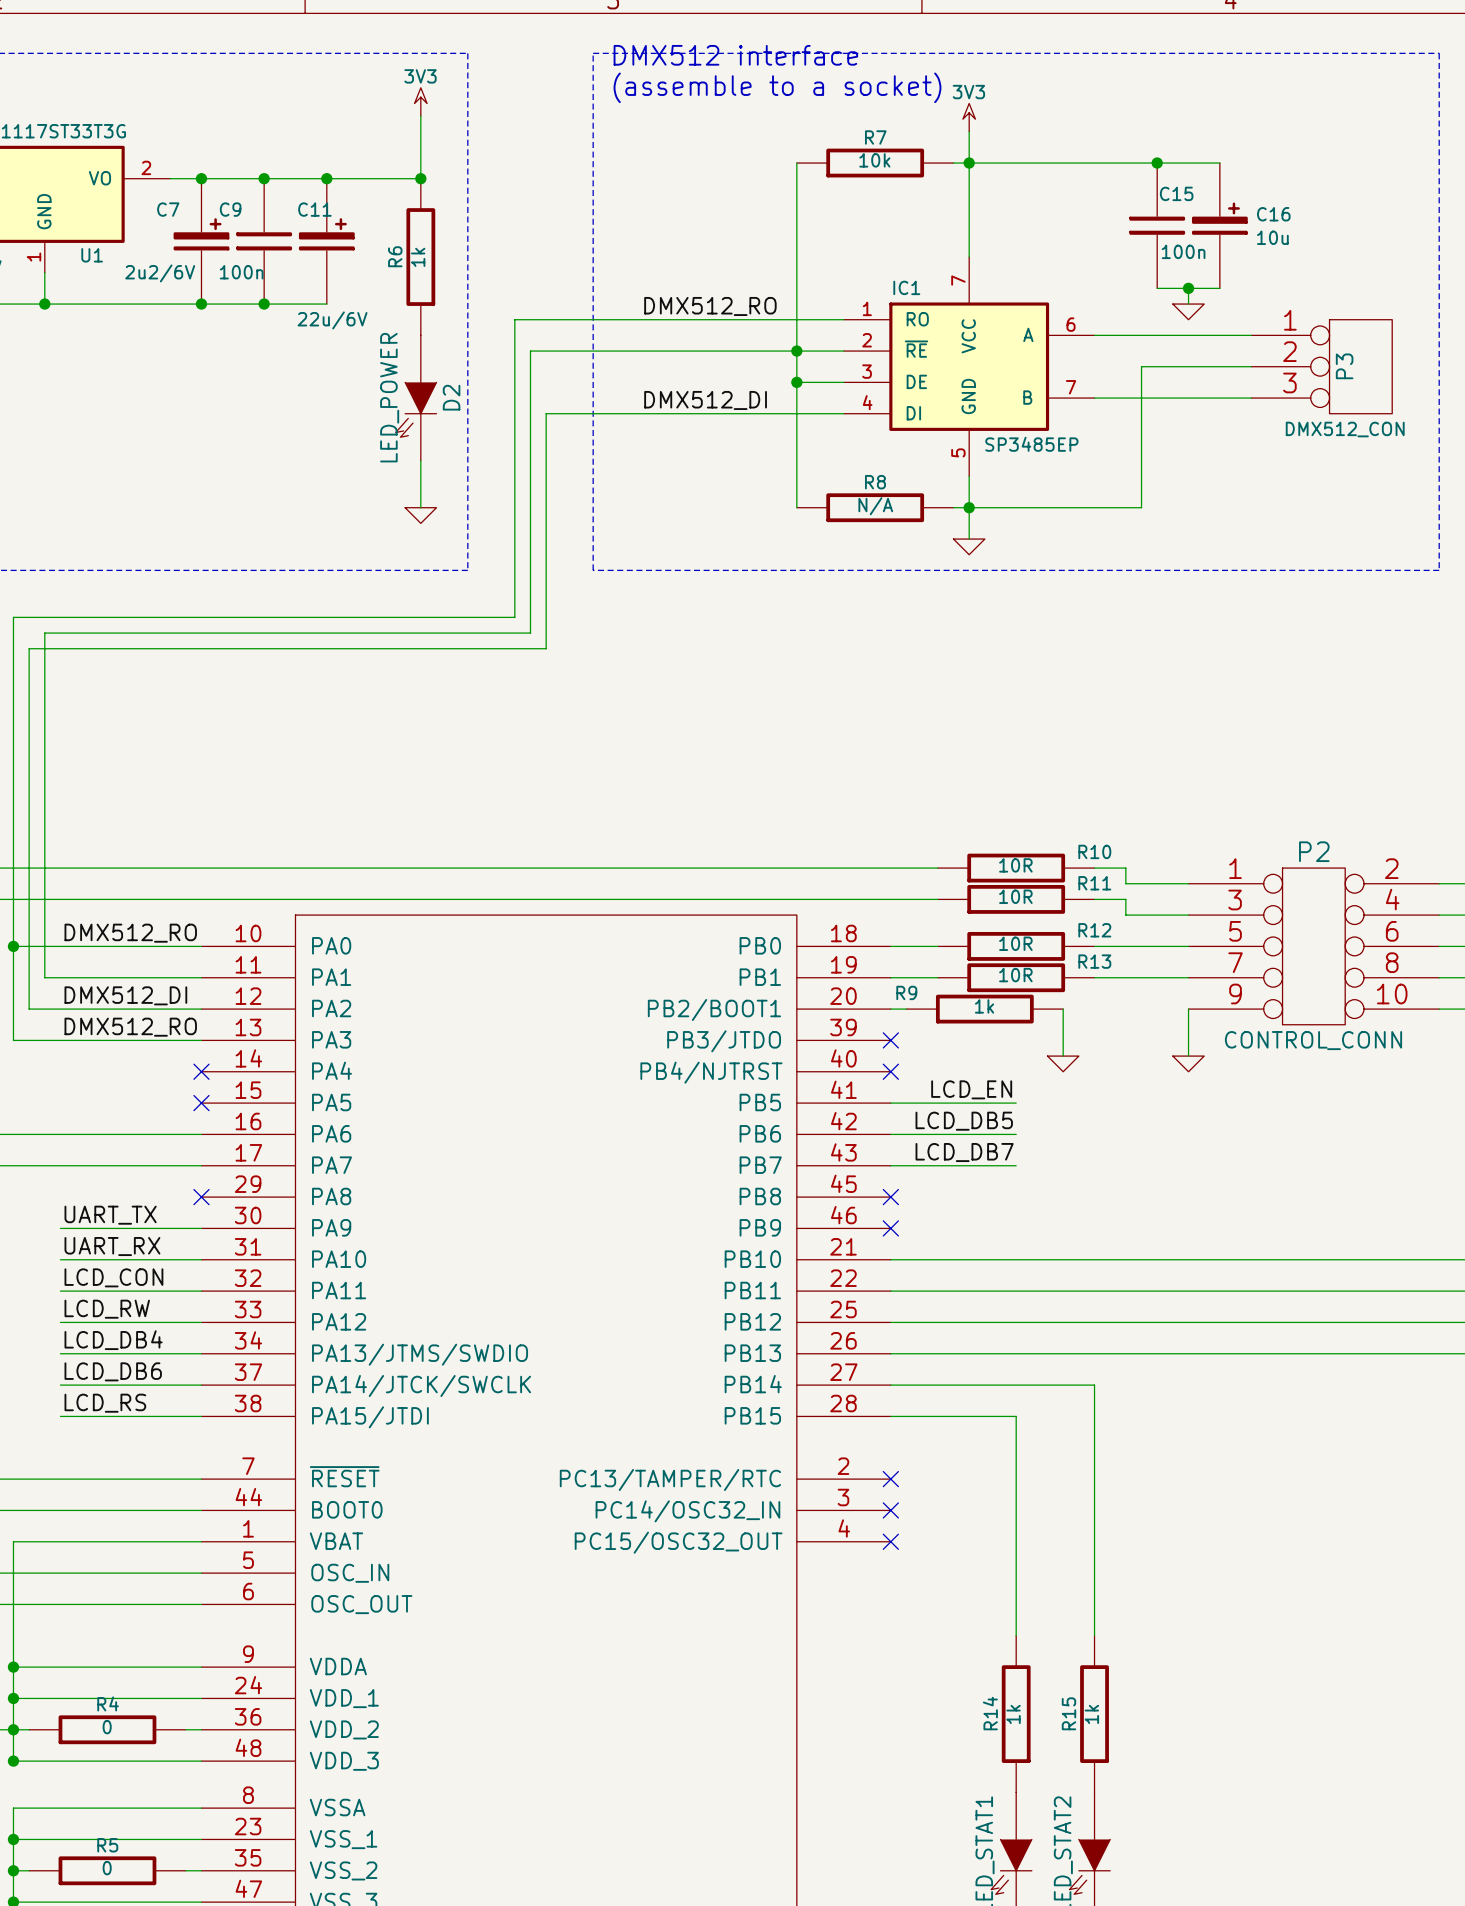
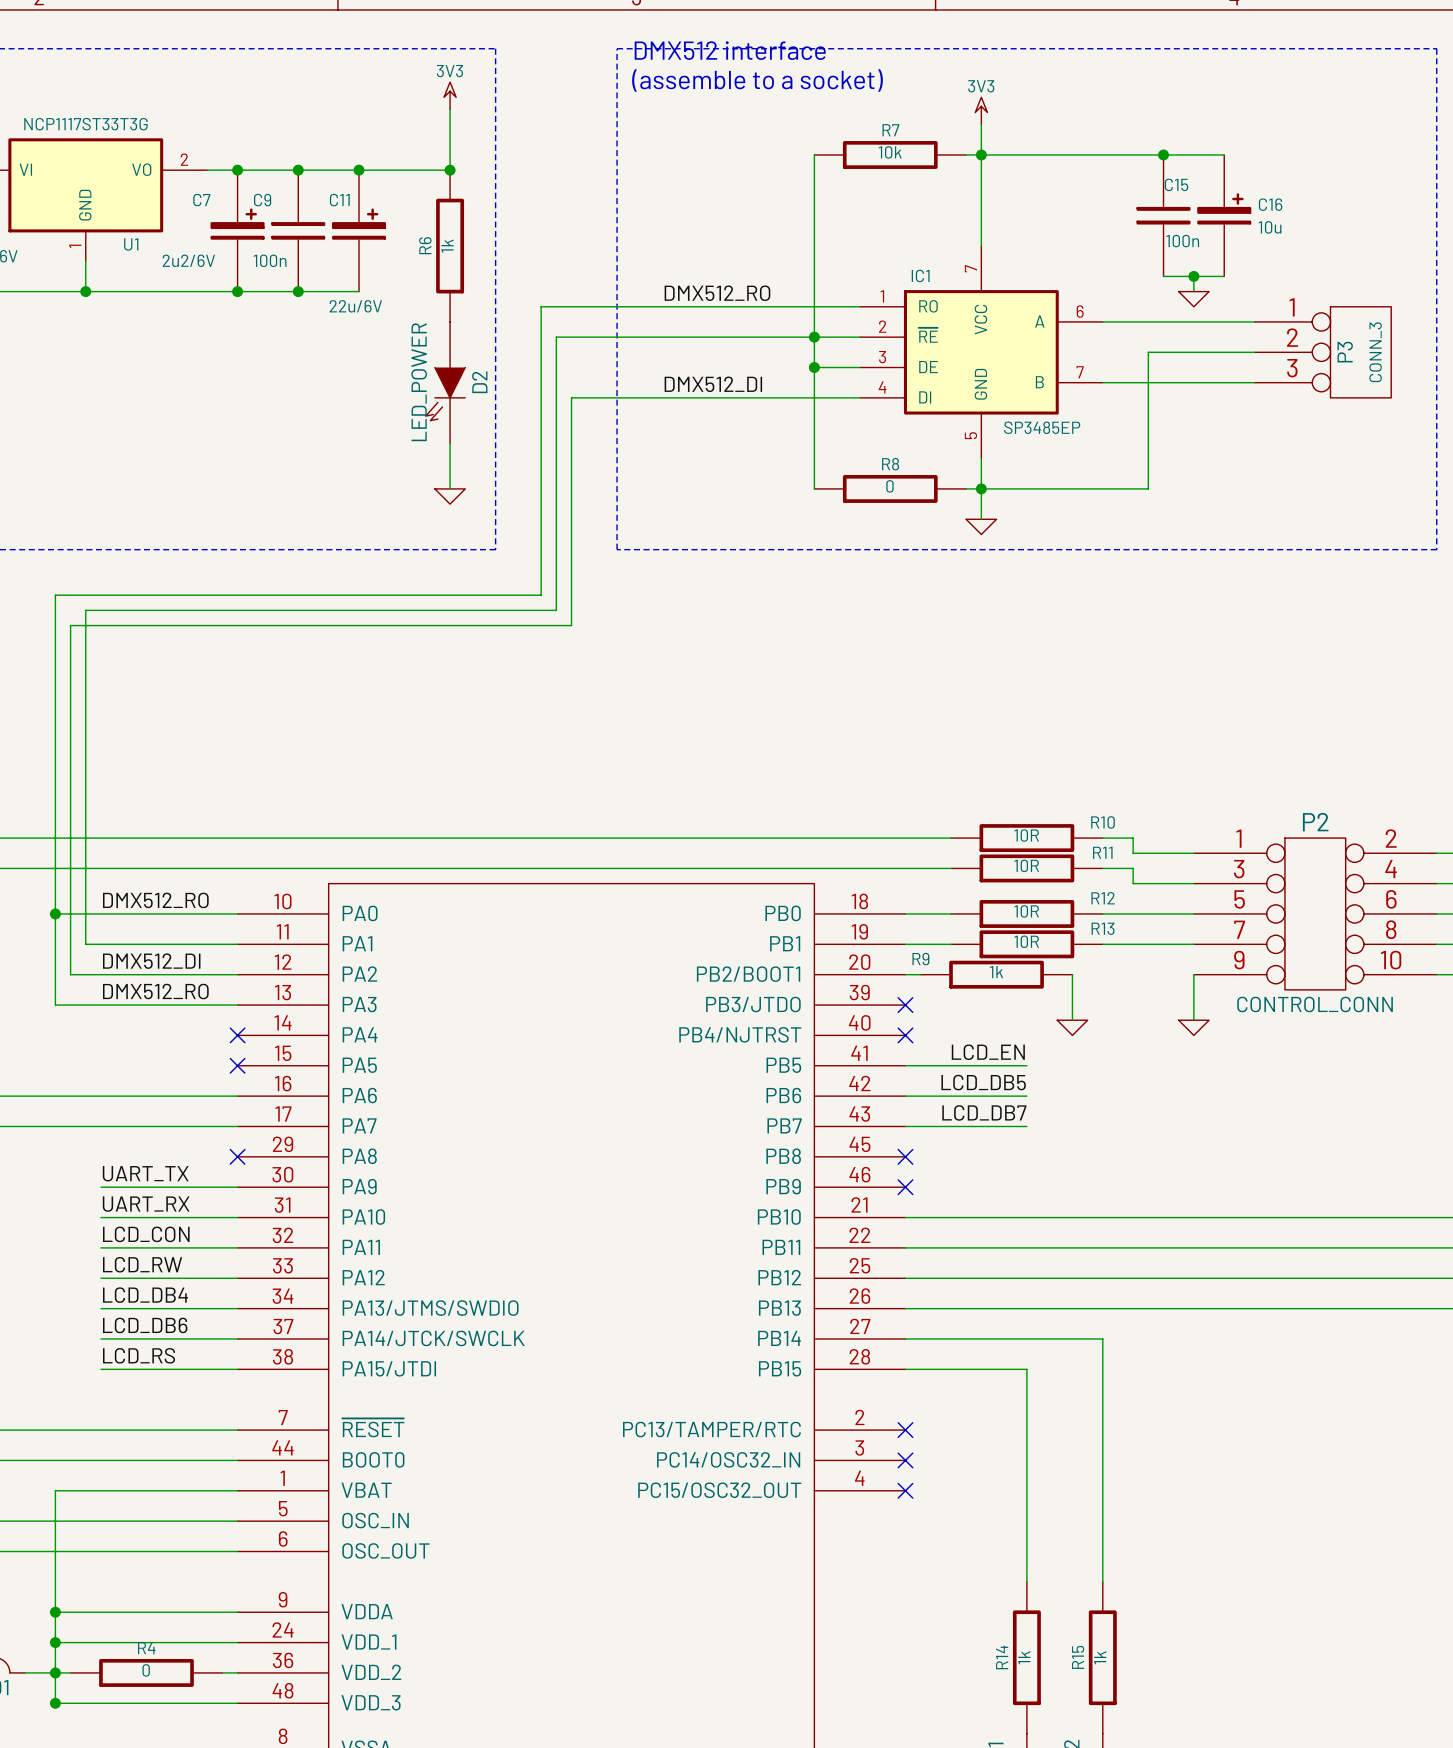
P3 value: DMX512_CON (1345, 429) -> CONN_3 (1375, 352)
R8 value: N/A (875, 506) -> 0 (889, 486)

